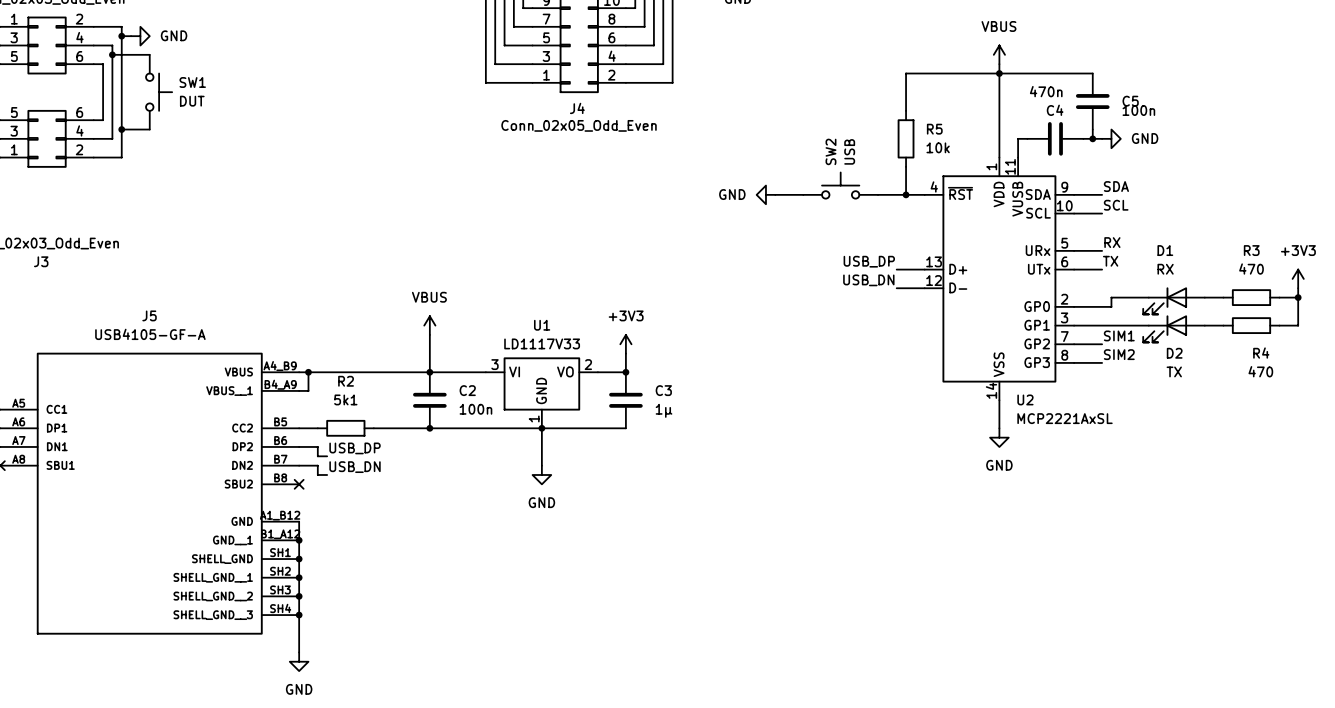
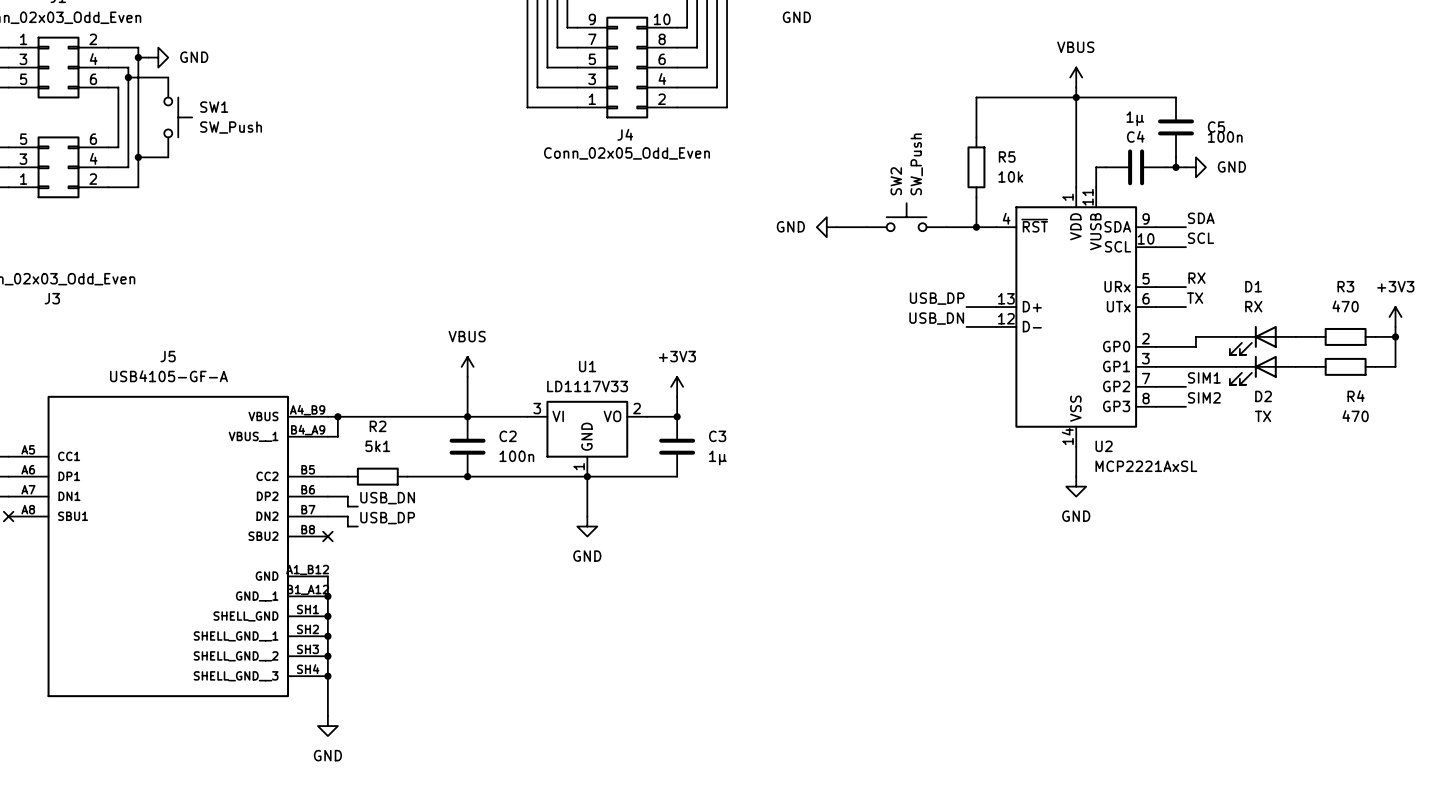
C4 value: 470n (1046, 91) -> 1μ (1135, 118)
SW1 value: DUT (192, 101) -> SW_Push (231, 127)
SW2 value: USB (849, 151) -> SW_Push (916, 164)
label: USB_DP (355, 448) -> USB_DN (387, 498)
label: USB_DN (355, 467) -> USB_DP (387, 518)

